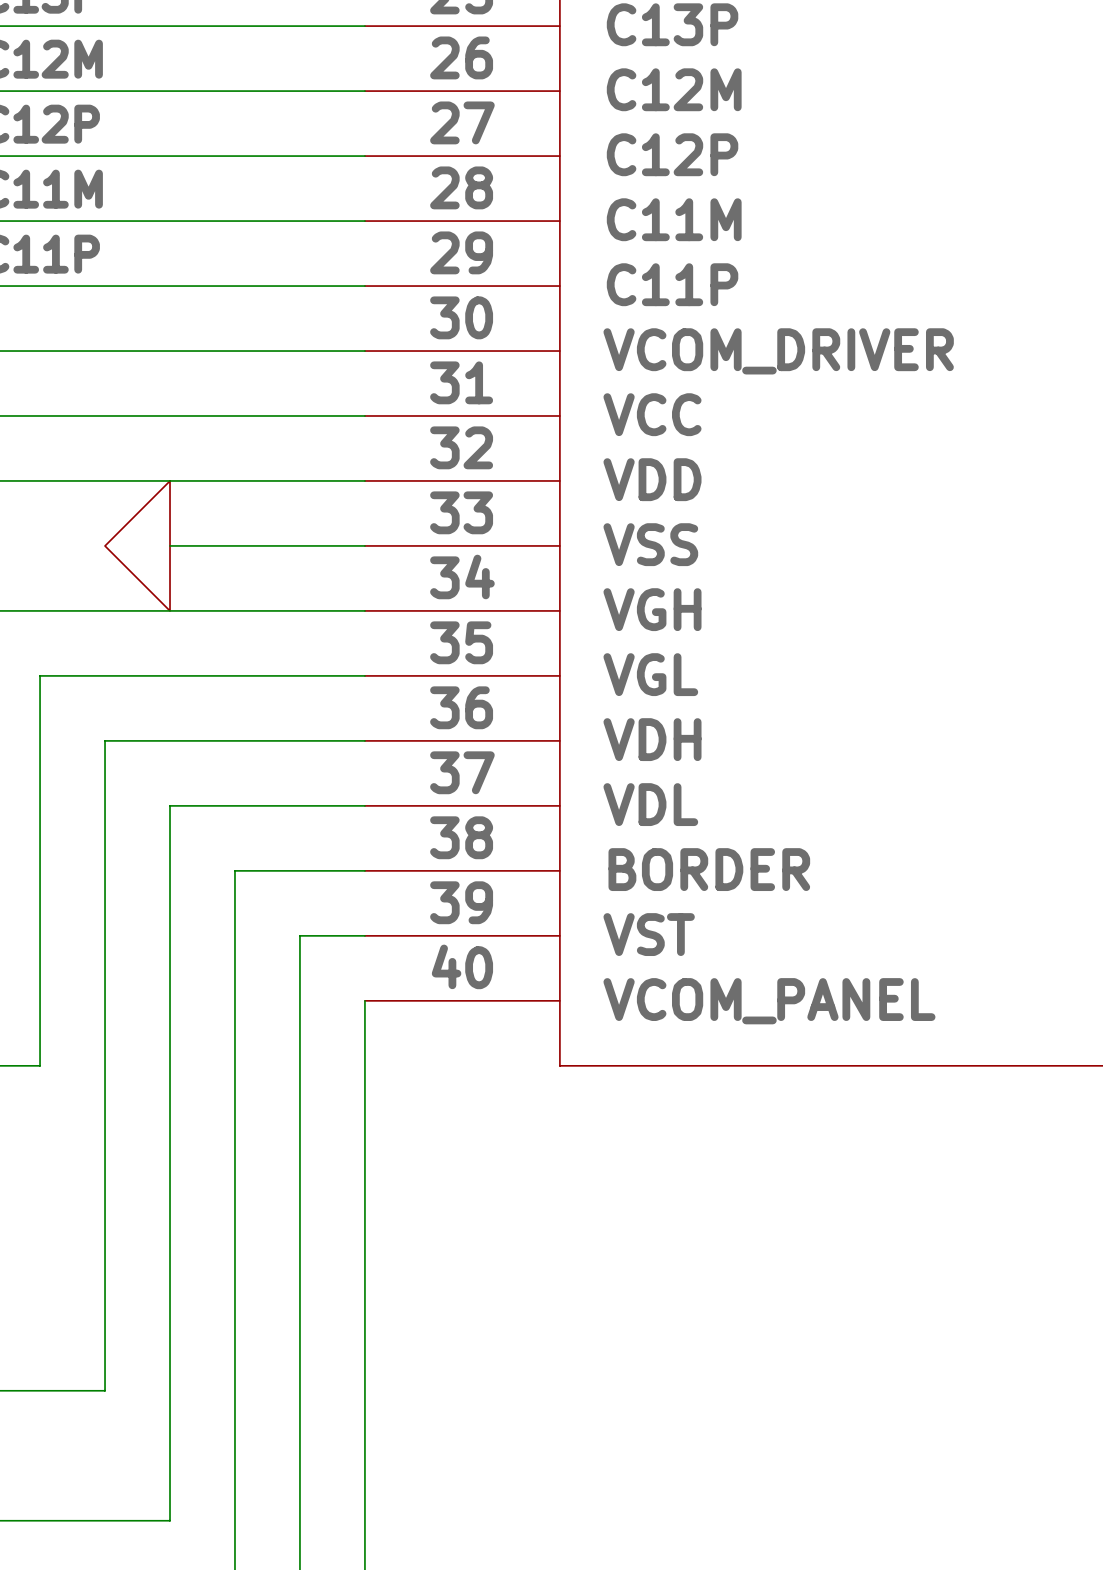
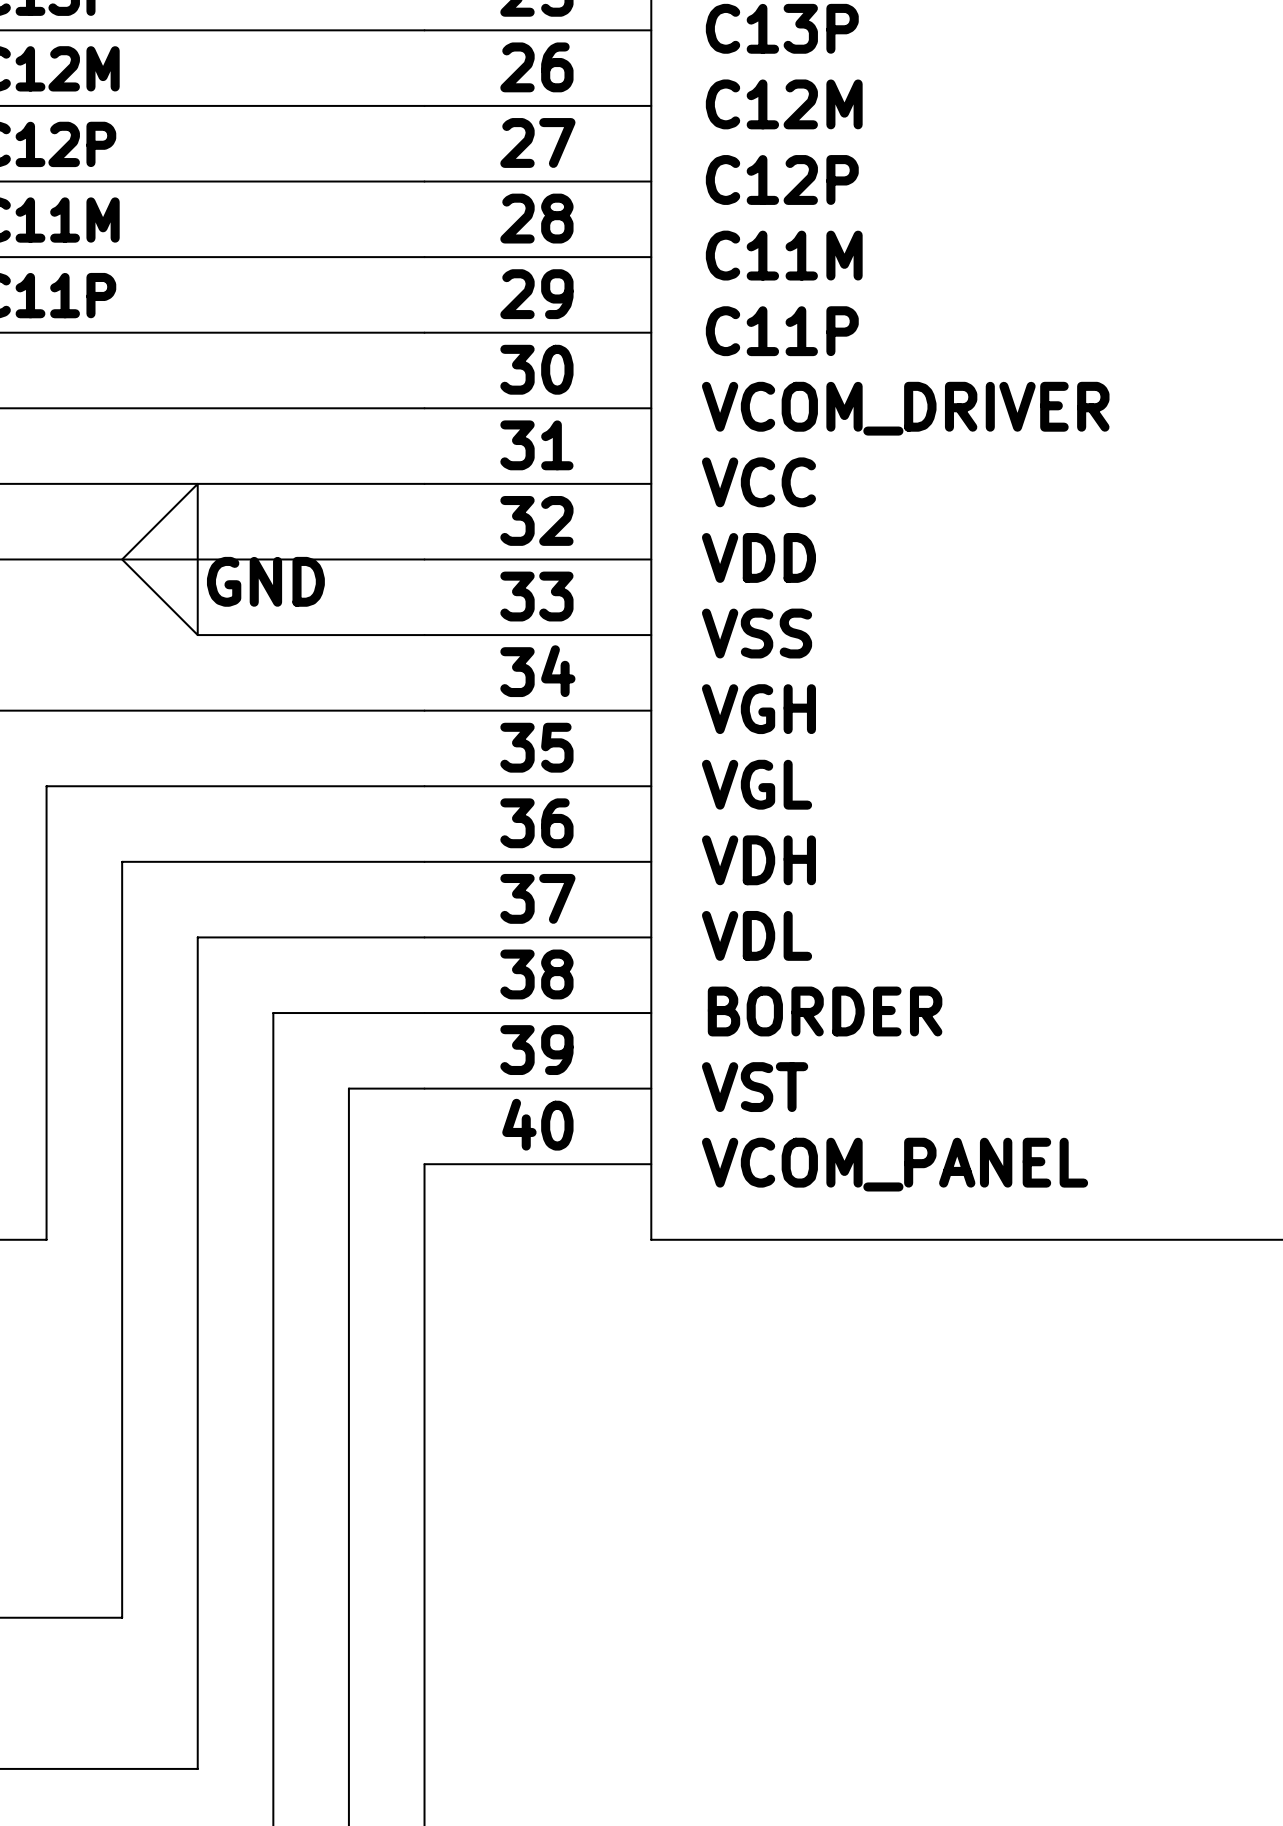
power symbol: none -> GND (159, 559)
power symbol: (137, 545) -> none

